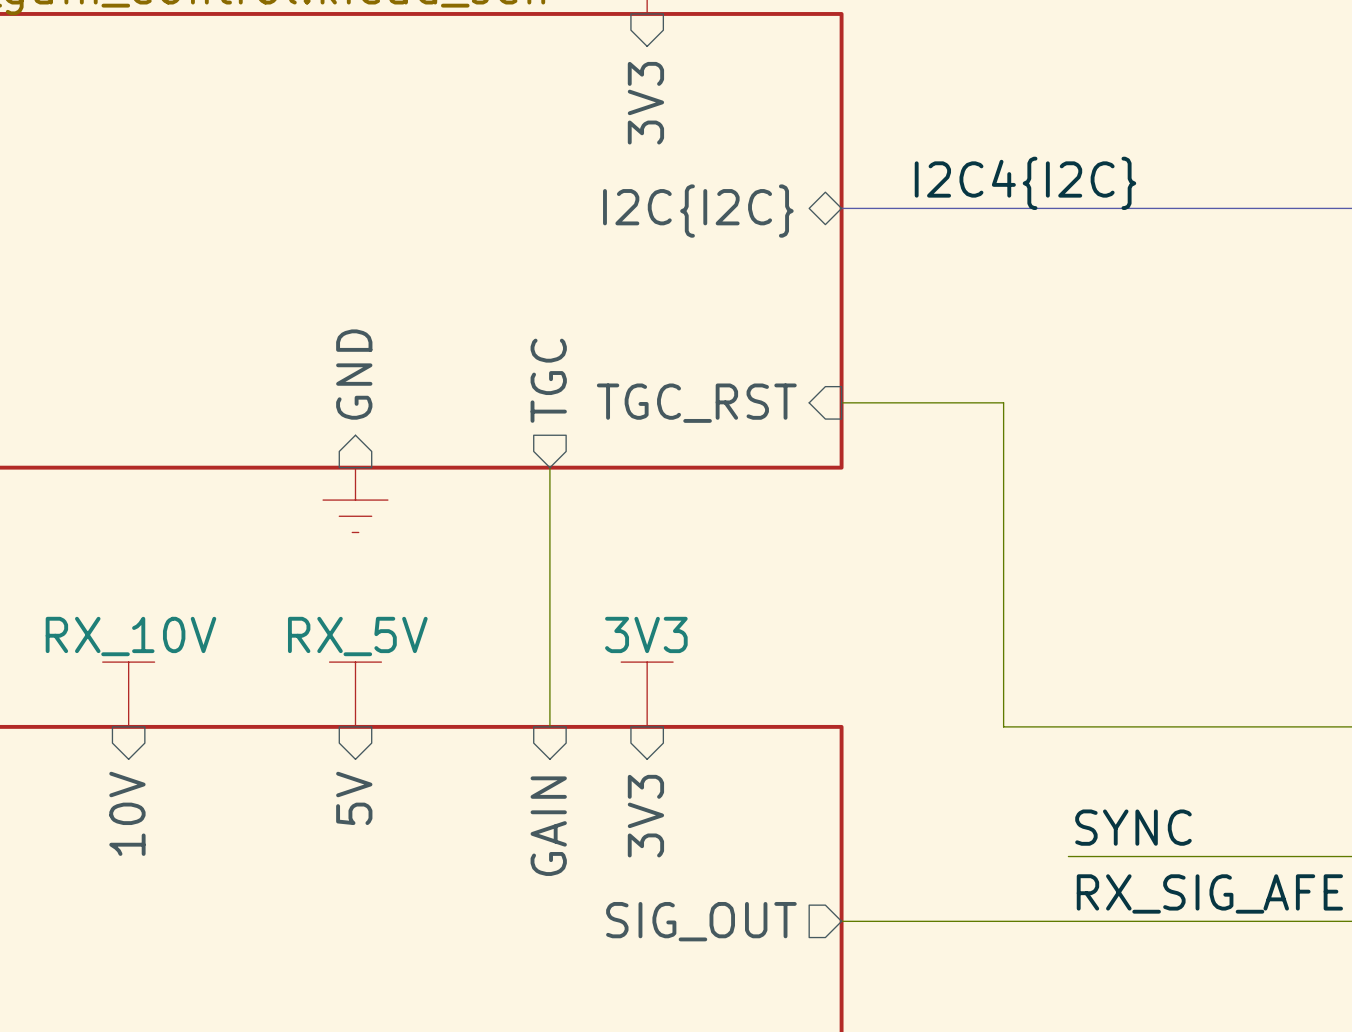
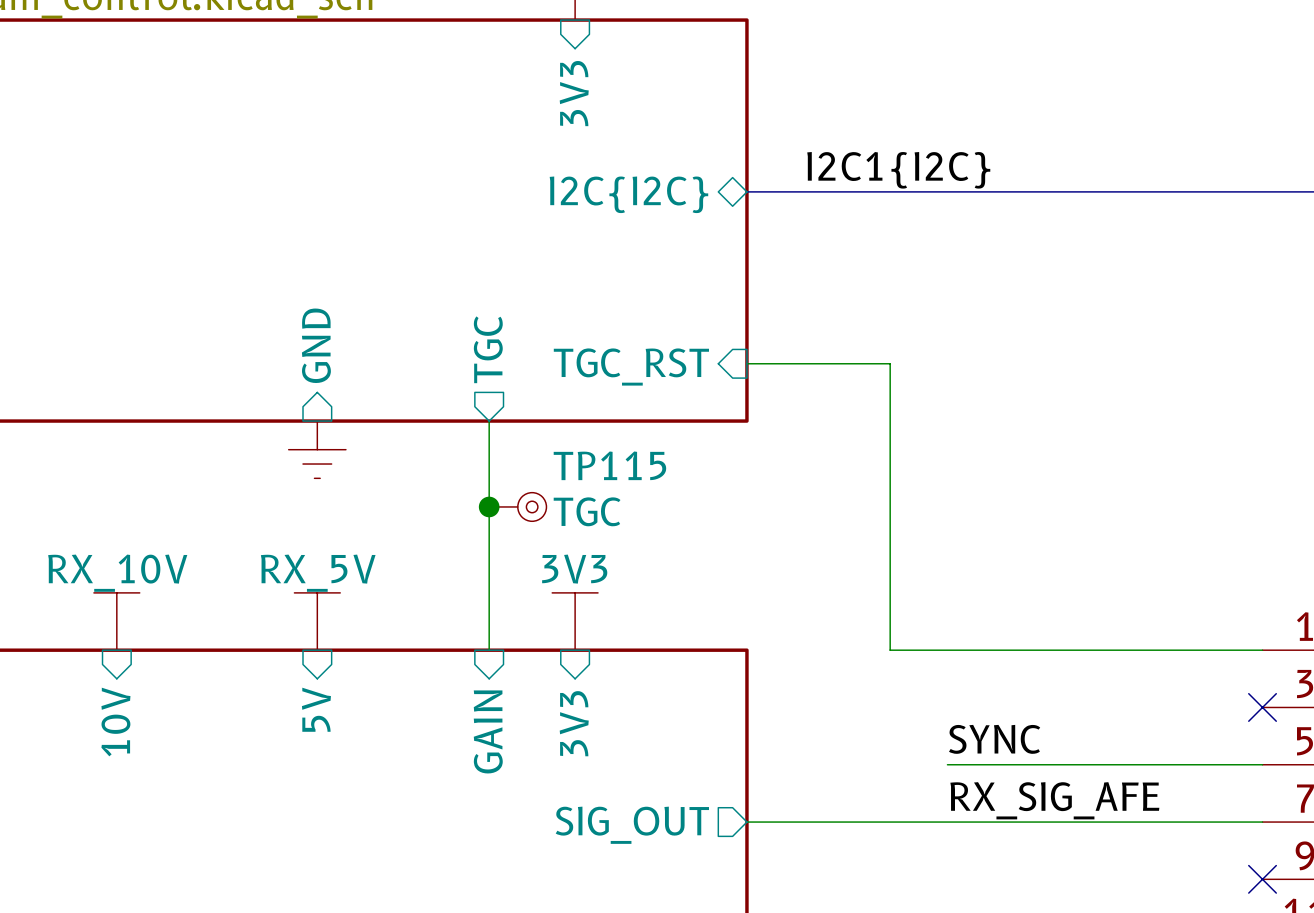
label: I2C4{I2C} (1025, 183) -> I2C1{I2C} (898, 170)
junction: none -> (489, 506)
TP115: none -> TGC (517, 506)

